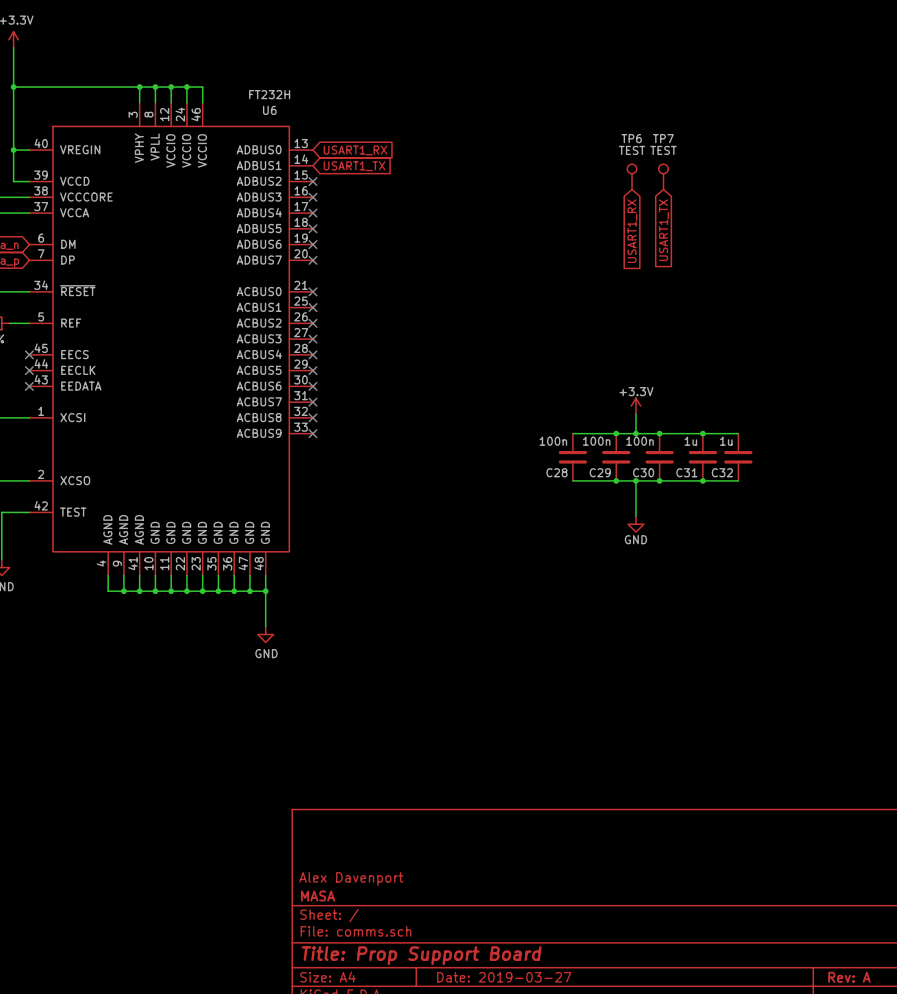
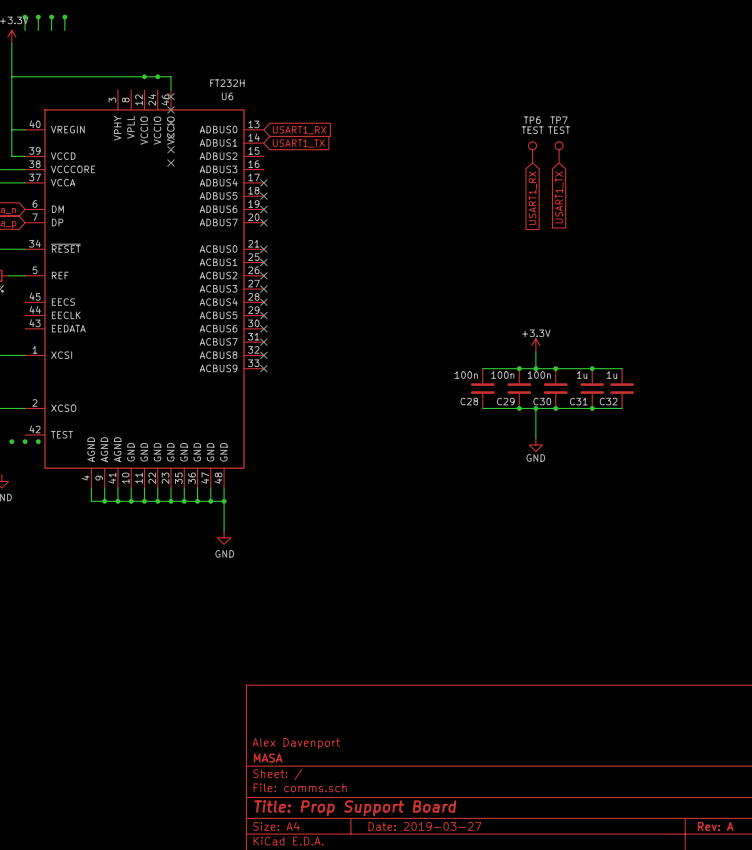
junction: none -> (25, 17)
junction: none -> (38, 17)
junction: none -> (51, 17)
junction: none -> (64, 17)
junction: (13, 87) -> none
wire: (139, 87) (139, 102) -> (25, 17) (25, 30)
junction: (139, 87) -> none
wire: (155, 87) (155, 102) -> (38, 17) (38, 30)
junction: (155, 87) -> none
wire: (171, 87) (171, 102) -> (51, 17) (51, 30)
wire: (186, 87) (186, 102) -> (64, 17) (64, 30)
no-connect mark: none -> (171, 96)
no-connect mark: none -> (171, 109)
no-connect mark: none -> (171, 123)
junction: (13, 150) -> none
no-connect mark: none -> (171, 136)
no-connect mark: none -> (171, 149)
no-connect mark: (312, 181) -> none
no-connect mark: none -> (171, 163)
no-connect mark: (312, 197) -> none
no-connect mark: (29, 354) -> none
no-connect mark: (29, 370) -> none
no-connect mark: (29, 386) -> none
wire: (29, 512) (1, 512) (1, 559) -> none
junction: none -> (11, 441)
junction: none -> (25, 441)
junction: none -> (38, 441)

